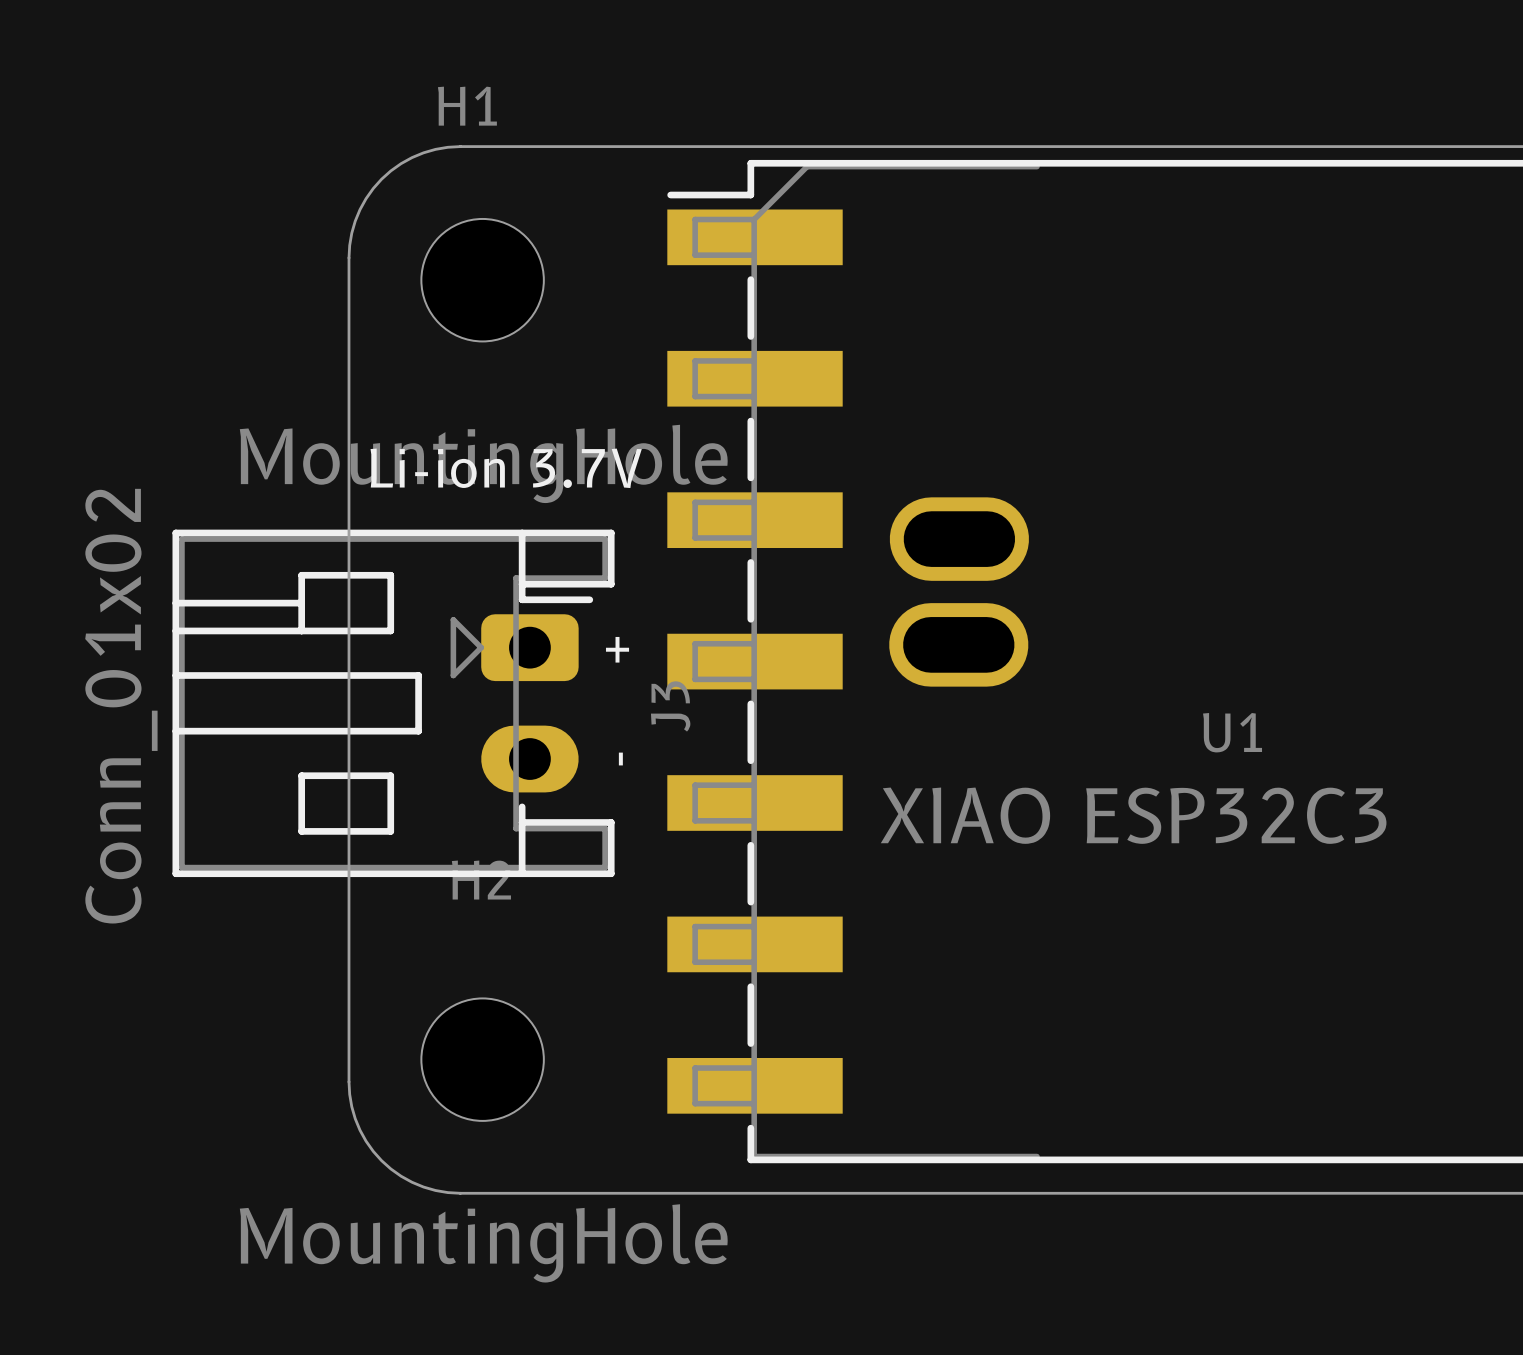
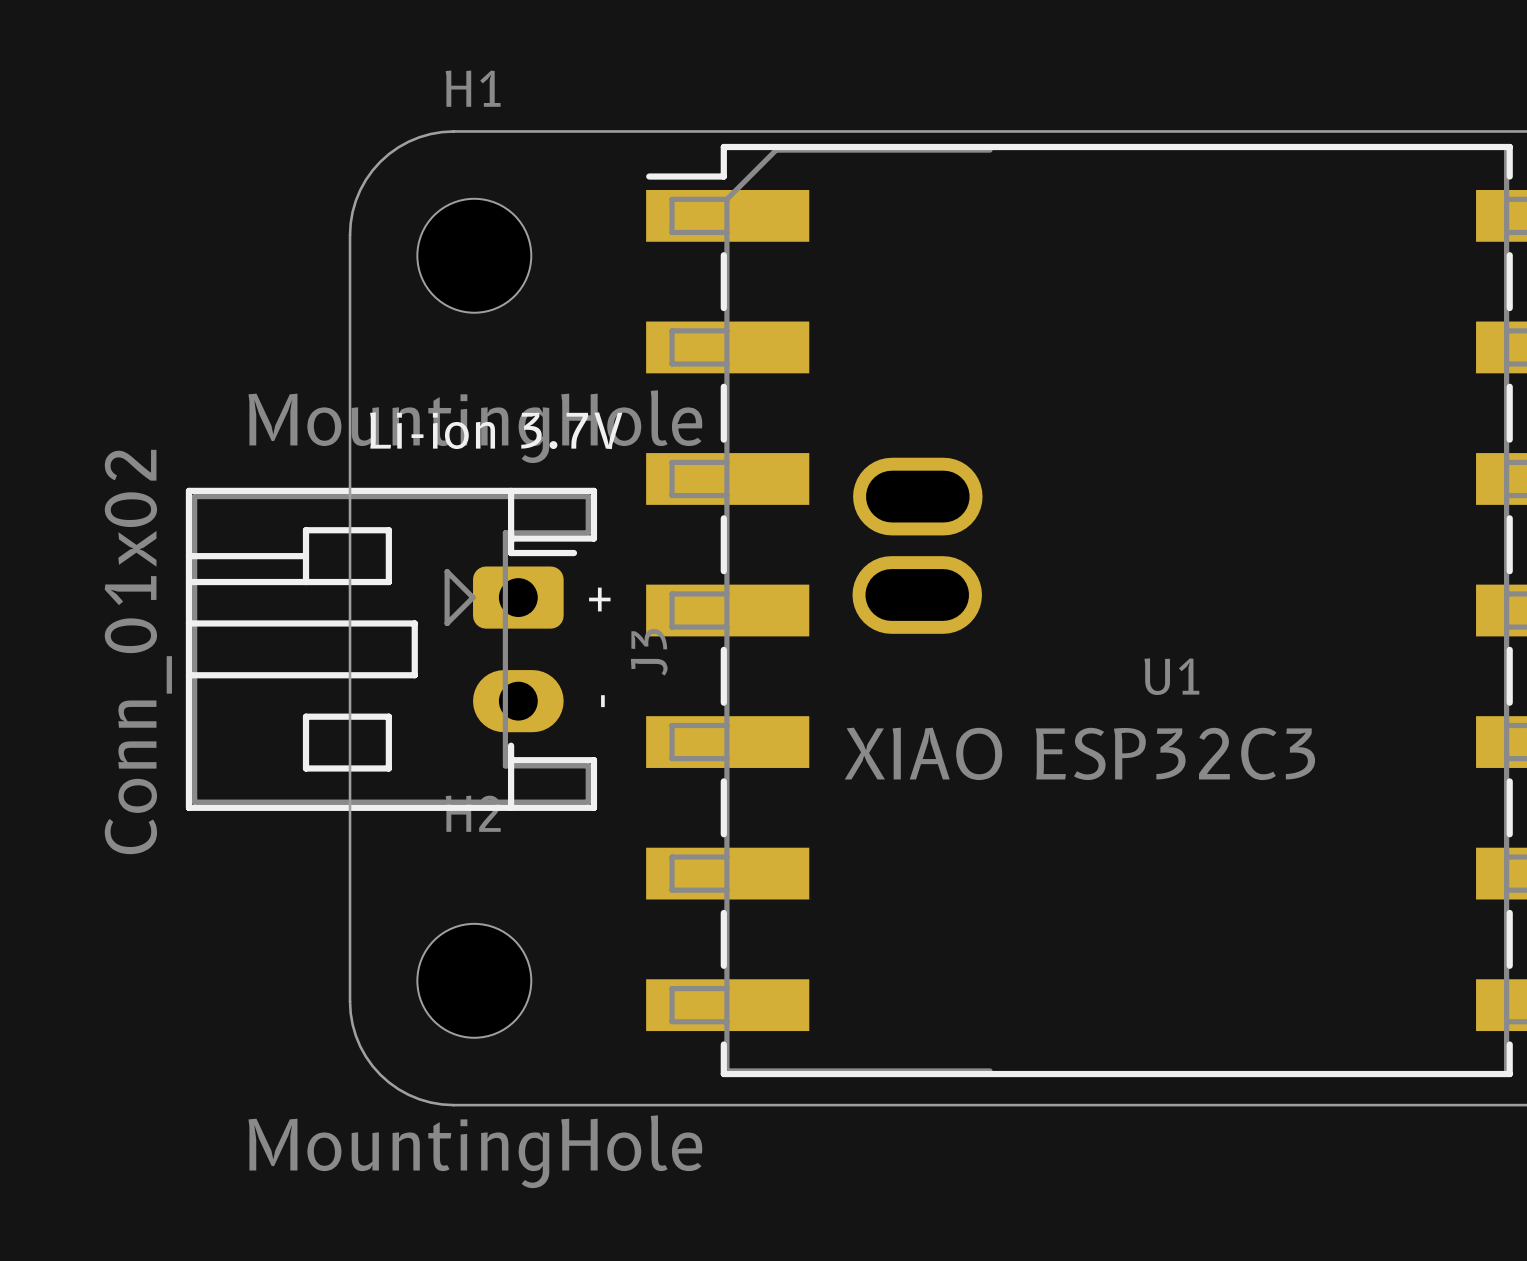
H1 name position: H1 (467, 106) -> H1 (473, 88)

